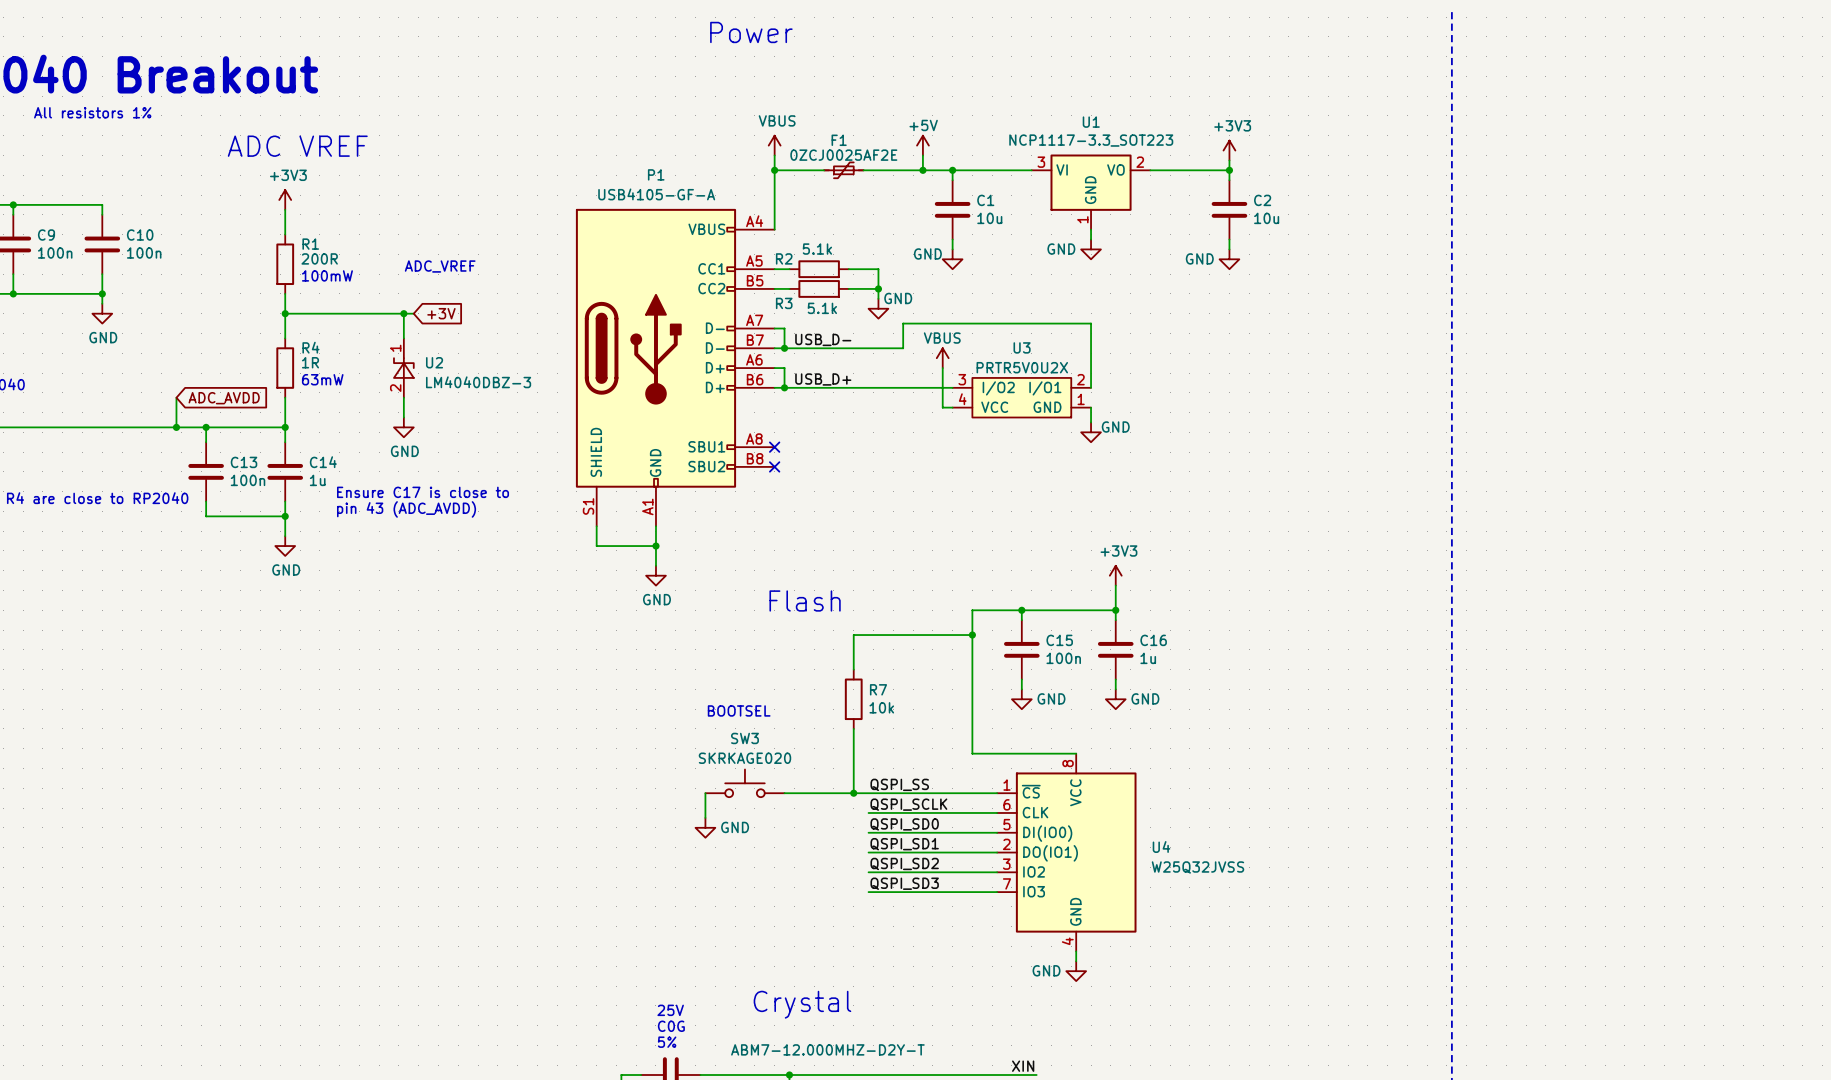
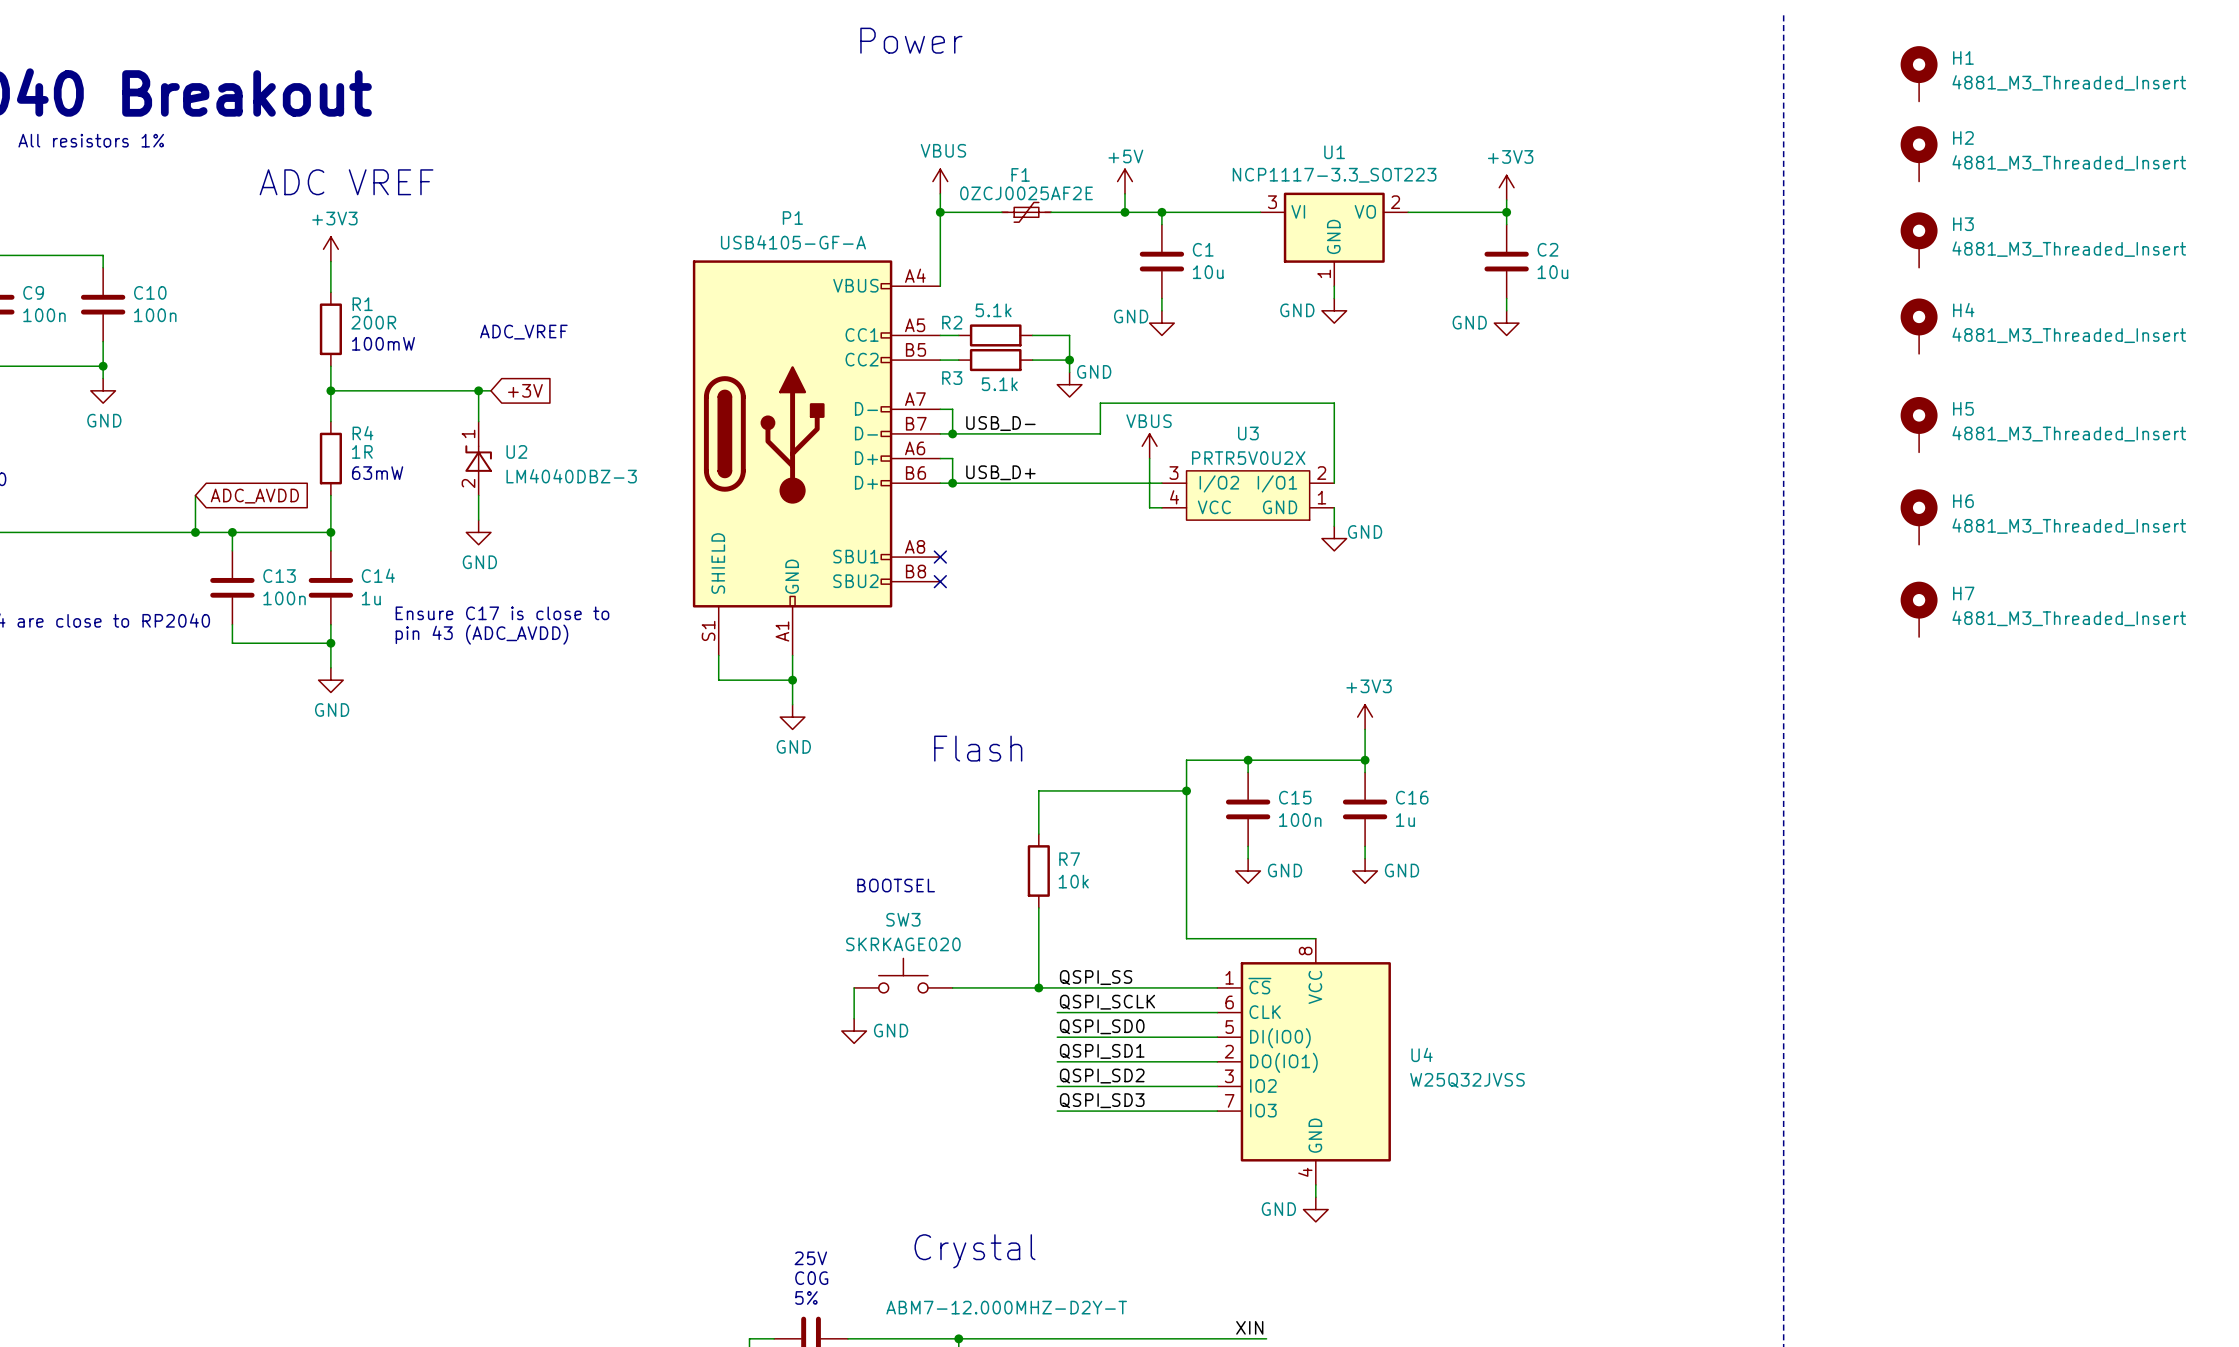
H1: none -> 4881_M3_Threaded_Insert (1919, 73)
H2: none -> 4881_M3_Threaded_Insert (1919, 153)
H3: none -> 4881_M3_Threaded_Insert (1919, 240)
H4: none -> 4881_M3_Threaded_Insert (1919, 326)
H5: none -> 4881_M3_Threaded_Insert (1919, 424)
H6: none -> 4881_M3_Threaded_Insert (1919, 517)
H7: none -> 4881_M3_Threaded_Insert (1919, 609)

